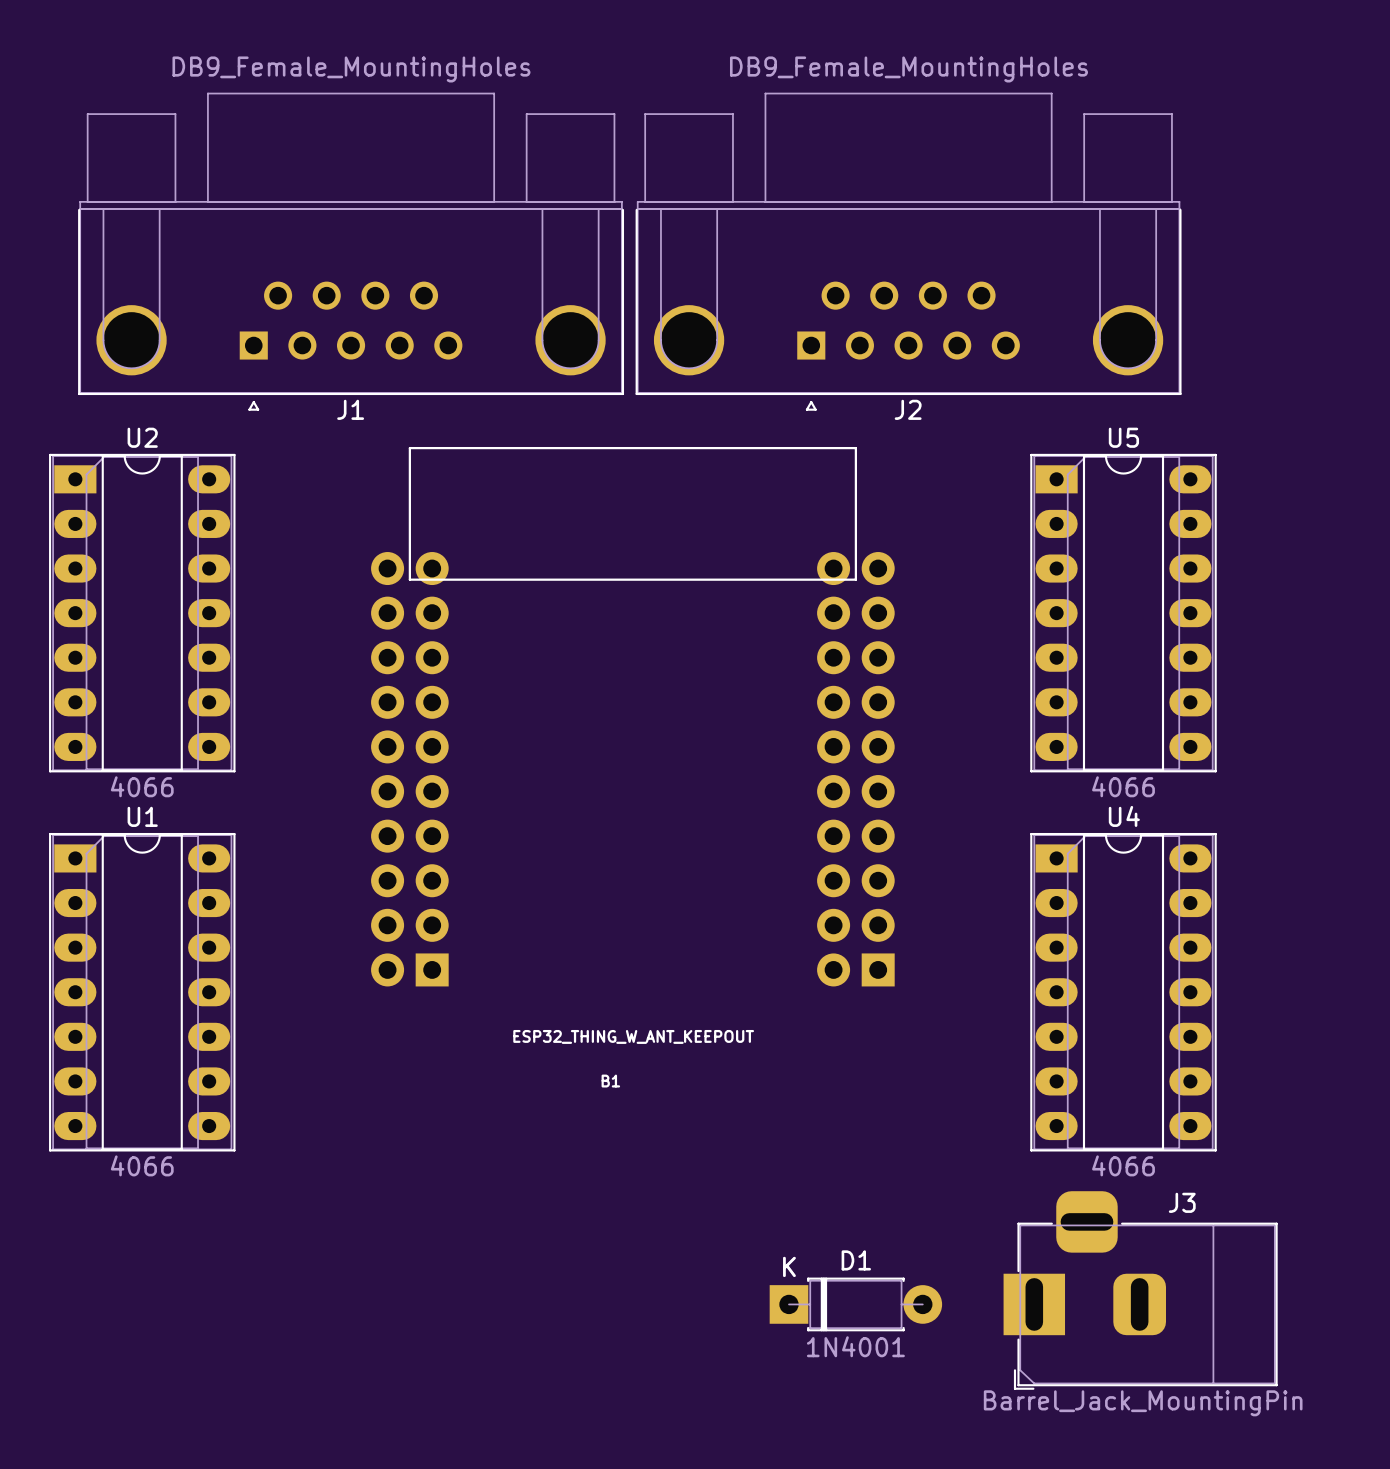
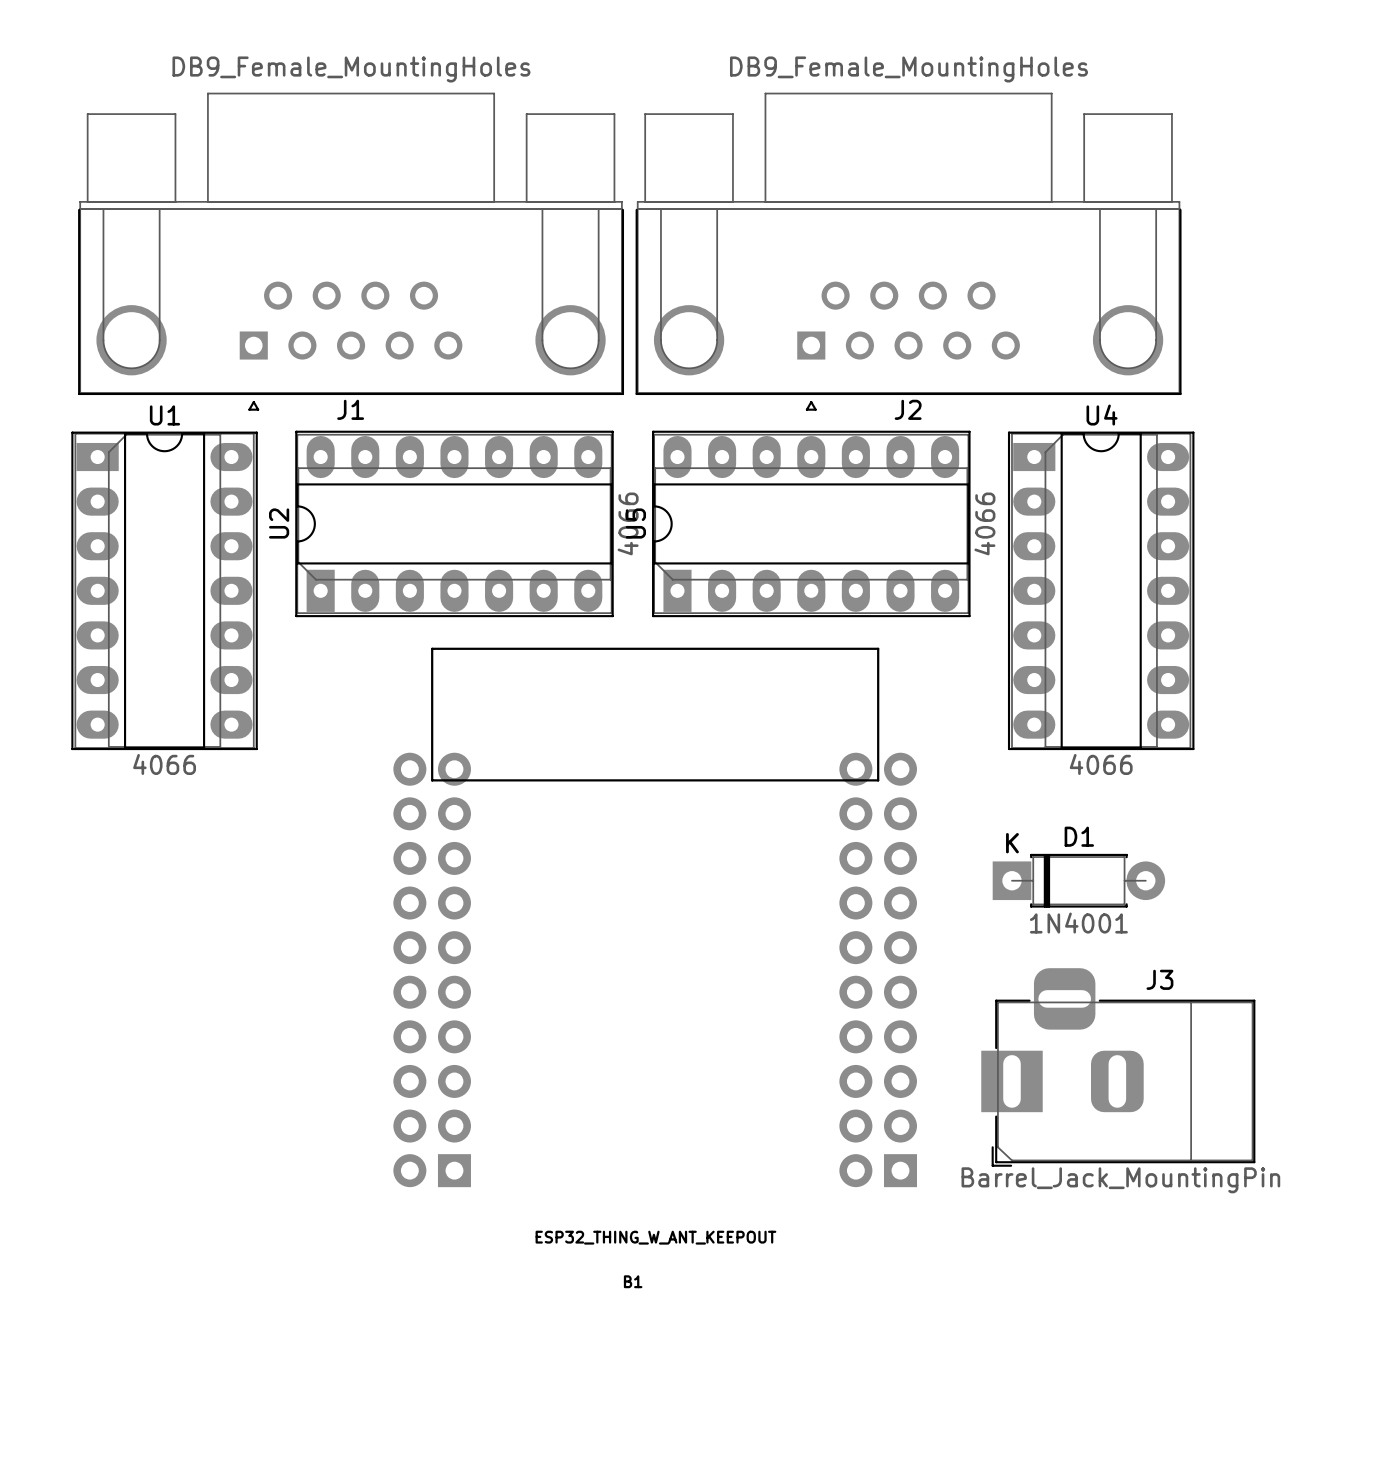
U2 rotation: 0° (142, 613) -> 90° counterclockwise (454, 523)
U2 position: (142, 613) -> (454, 523)
U5 rotation: 0° (1123, 613) -> 90° counterclockwise (811, 523)
U5 position: (1123, 613) -> (811, 523)
B1 position: (632, 716) -> (655, 917)
U1 position: (142, 992) -> (164, 590)
U4 position: (1123, 992) -> (1101, 590)
J3 position: (1140, 1290) -> (1118, 1067)
D1 position: (855, 1304) -> (1078, 880)

